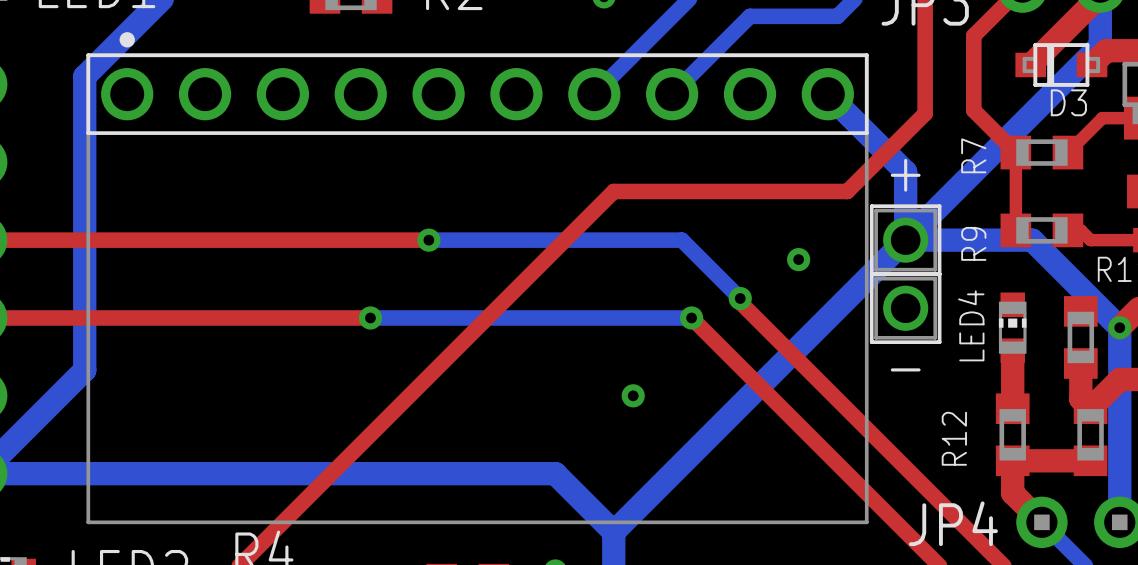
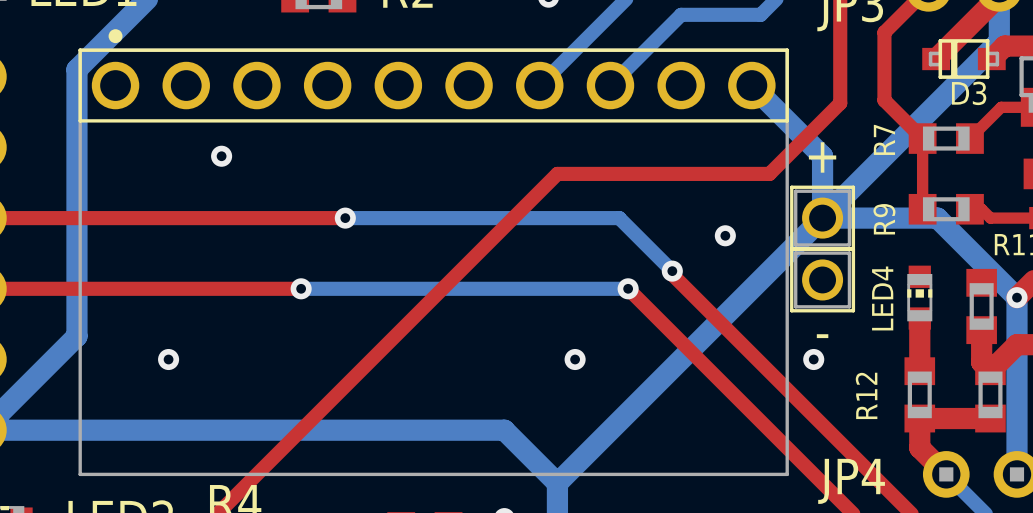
via: none -> (221, 156)
top track: (380, 240) (428, 240) -> none
bottom track: none -> (345, 218) (389, 218)
via: none -> (345, 218)
via: (428, 240) -> none
top track: (331, 317) (370, 317) -> none
bottom track: none -> (301, 288) (336, 288)
via: none -> (301, 288)
via: (370, 317) -> none
via: none -> (168, 359)
via: none -> (813, 359)

